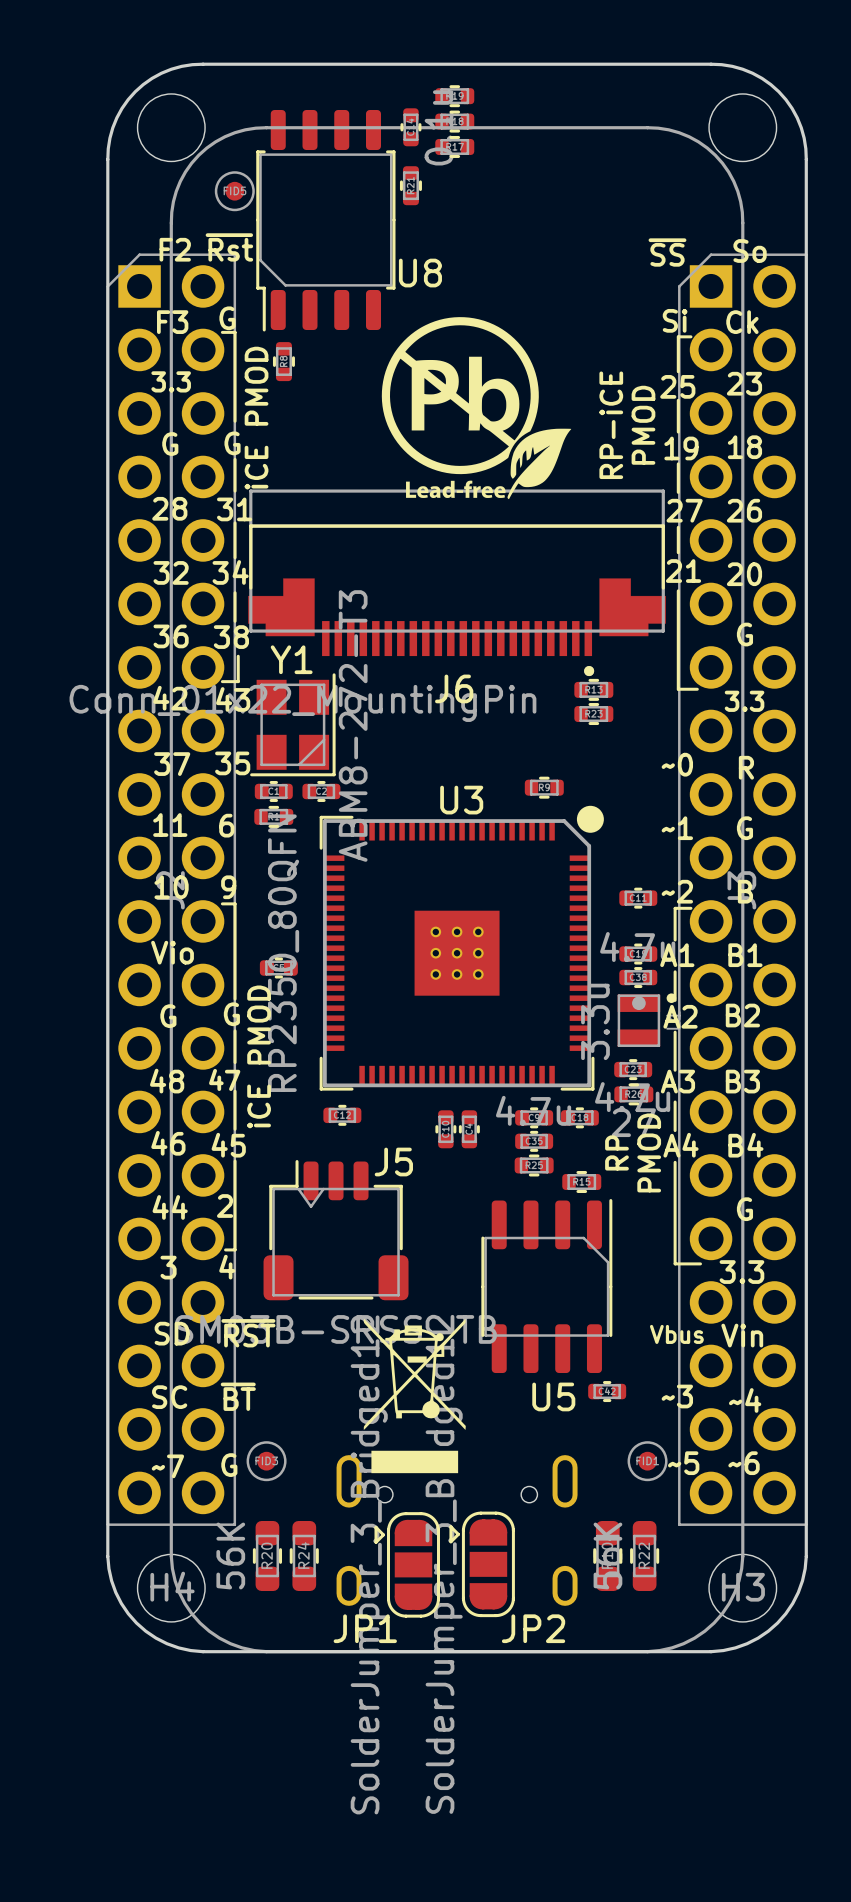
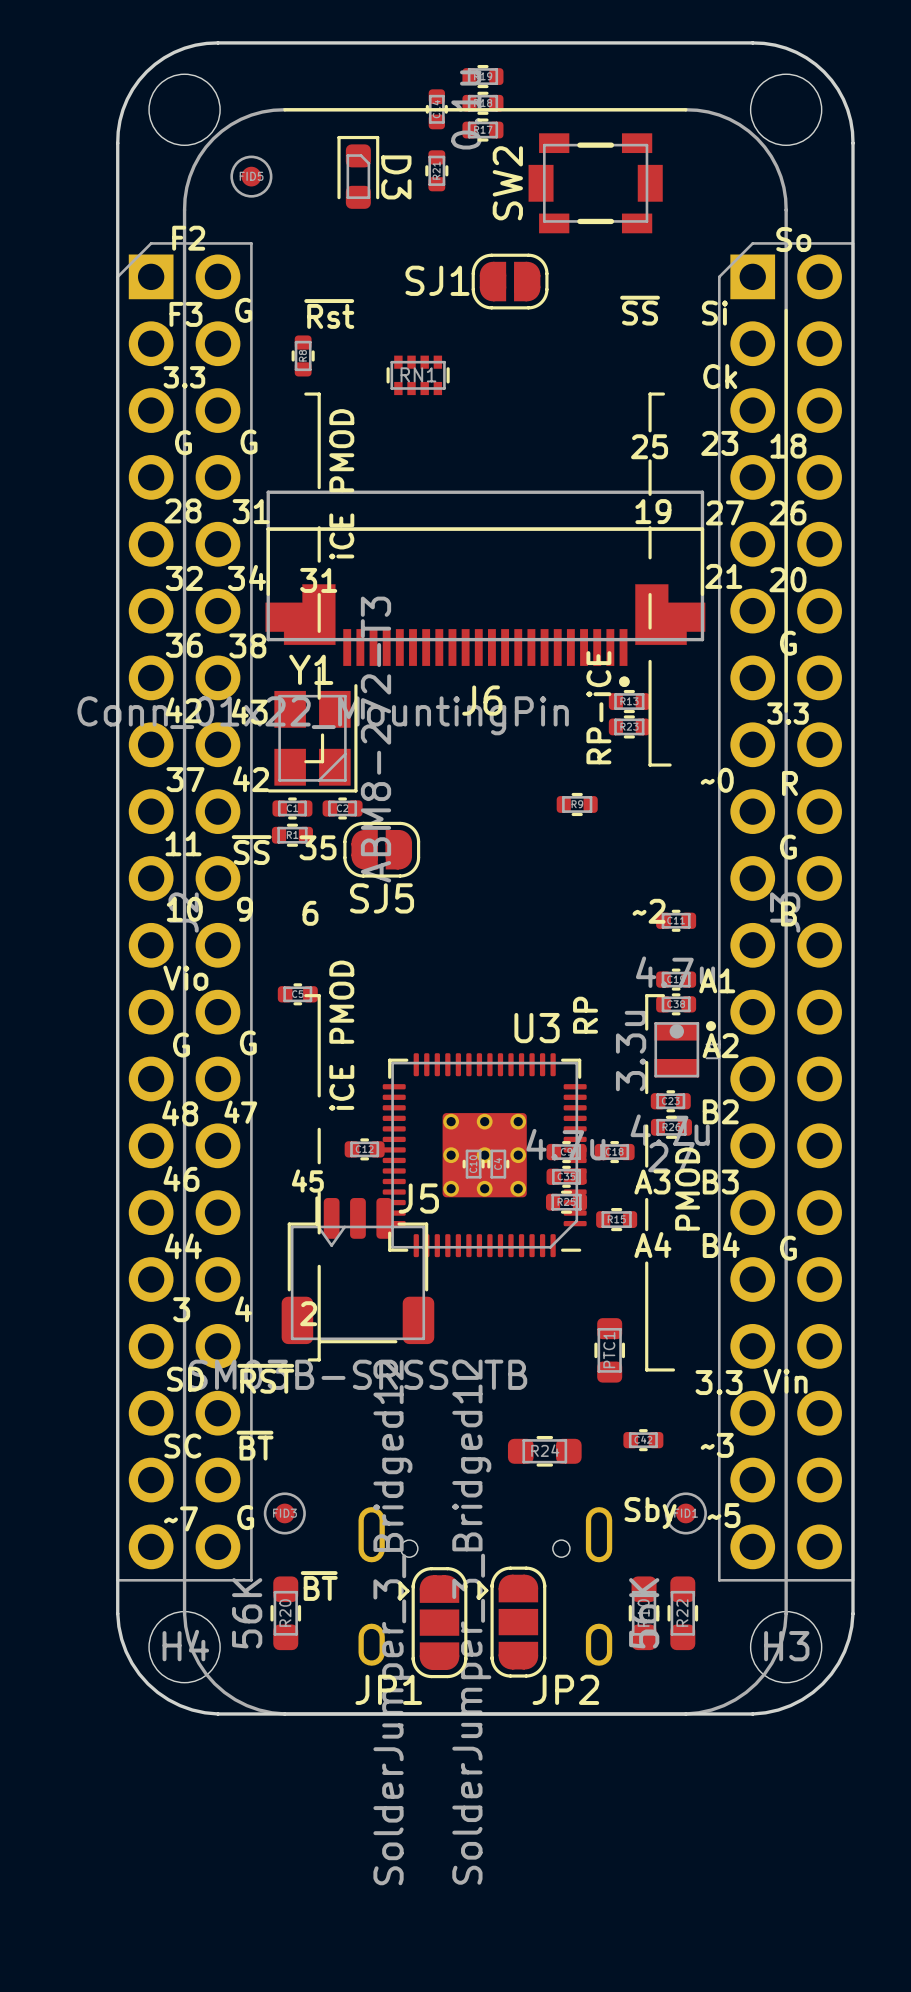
line: none -> (284, 109) (685, 109)
D3: none -> (358, 172)
SW2: none -> (595, 183)
U8: (325, 220) -> none
text position: ~{Rst} (229, 247) -> ~{Rst} (329, 313)
text position: ~{SS} (667, 252) -> ~{SS} (640, 310)
SJ1: none -> (510, 281)
drawing: [381, 317, 572, 500] -> none
line: none -> (786, 310) (786, 711)
text position: Ck (742, 322) -> Ck (720, 376)
line: (222, 332) (235, 332) (235, 421) -> (305, 394) (319, 394) (319, 487)
line: (690, 336) (678, 336) (678, 371) -> (663, 394) (650, 394) (650, 430)
RN1: none -> (418, 375)
text position: 23 (744, 383) -> 23 (719, 443)
text position: 25 (677, 386) -> 25 (649, 446)
line: (678, 400) (678, 432) -> (650, 460) (650, 494)
text position: iCE PMOD (256, 418) -> iCE PMOD (341, 484)
text position: RP-iCE (611, 425) -> RP-iCE (598, 707)
text: PMOD (643, 425) -> none
text position: 19 (681, 448) -> 19 (653, 511)
line: (235, 459) (235, 491) -> (319, 527) (319, 561)
line: (678, 463) (678, 492) -> (650, 527) (650, 557)
line: (235, 522) (235, 557) -> (319, 594) (319, 631)
line: (678, 527) (678, 552) -> none
text: none -> 31 (318, 580)
line: none -> (650, 594) (650, 628)
line: (678, 590) (678, 689) (697, 689) -> (650, 661) (650, 765) (670, 765)
line: (235, 592) (235, 621) -> (319, 668) (319, 698)
line: (238, 656) (238, 681) (222, 681) -> (322, 734) (322, 761) (305, 761)
text: 35 (232, 763) -> 42 (251, 779)
U3 name position: U3 (461, 800) -> U3 (537, 1028)
U3 footprint: [319, 805, 604, 1091] -> [382, 1053, 587, 1258]
text position: 6 (226, 825) -> 6 (310, 913)
text: none -> 35 (318, 847)
text: ~1 (677, 828) -> none
text: none -> ~{SS} (251, 850)
SJ5: none -> (381, 849)
text position: ~2 (677, 891) -> ~2 (649, 911)
line: (222, 903) (235, 903) (235, 999) -> (305, 995) (319, 995) (319, 1095)
line: (690, 908) (675, 908) (675, 940) -> (663, 995) (646, 995) (646, 1029)
U3 value: RP2350_80QFN (283, 953) -> none
text: B1 (745, 955) -> none
line: (675, 971) (675, 1000) -> (646, 1062) (646, 1092)
text: B2 (742, 1015) -> none
line: (235, 1030) (235, 1062) -> (319, 1129) (319, 1162)
line: (675, 1032) (675, 1070) -> (646, 1125) (646, 1166)
text position: iCE PMOD (259, 1056) -> iCE PMOD (341, 1035)
text: A3 (677, 1081) -> B2 (720, 1111)
text: B3 (742, 1081) -> none
line: (235, 1091) (235, 1129) -> (319, 1192) (319, 1232)
line: (675, 1101) (675, 1130) -> (646, 1199) (646, 1229)
text position: 45 (228, 1145) -> 45 (307, 1181)
text: A4 (680, 1145) -> B3 (720, 1182)
text position: B4 (745, 1145) -> B4 (721, 1245)
text: none -> A3 (652, 1182)
text position: RP (616, 1152) -> RP (585, 1015)
line: (235, 1161) (235, 1249) (225, 1249) -> (319, 1266) (319, 1359) (309, 1359)
line: (675, 1162) (675, 1263) (700, 1263) -> (646, 1263) (646, 1369) (673, 1369)
text position: 2 (225, 1206) -> 2 (308, 1313)
text: none -> A4 (652, 1245)
text position: 3.3 (741, 1272) -> 3.3 (719, 1382)
U5: (546, 1286) -> none
PTC1: none -> (609, 1350)
drawing: [363, 1318, 466, 1474] -> none
text: Vbus (676, 1334) -> none
text: ~4 (745, 1400) -> none
text: none -> Sby (650, 1513)
text: ~6 (744, 1463) -> none
text: none -> ~{BT} (319, 1586)
R24 rotation: 0° (304, 1556) -> 90° clockwise (544, 1451)
R24 position: (304, 1556) -> (544, 1451)

